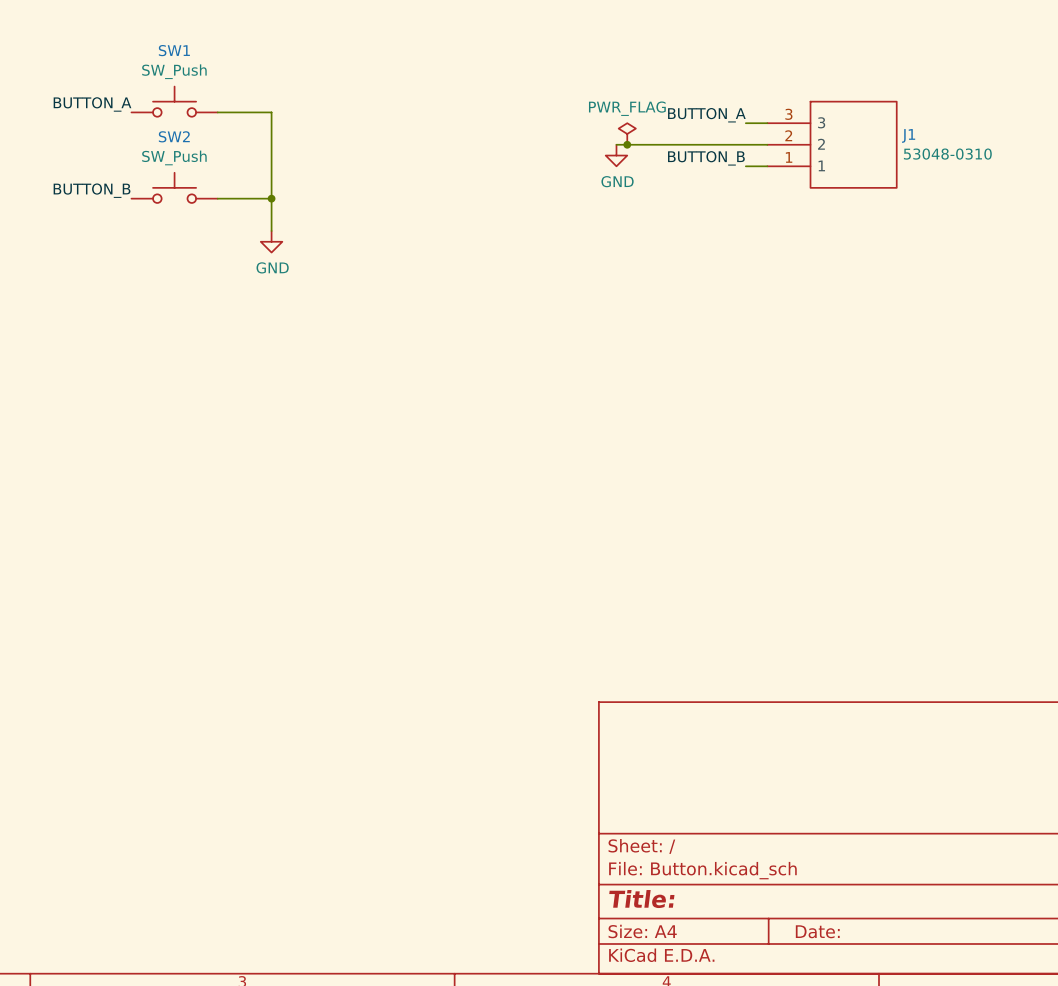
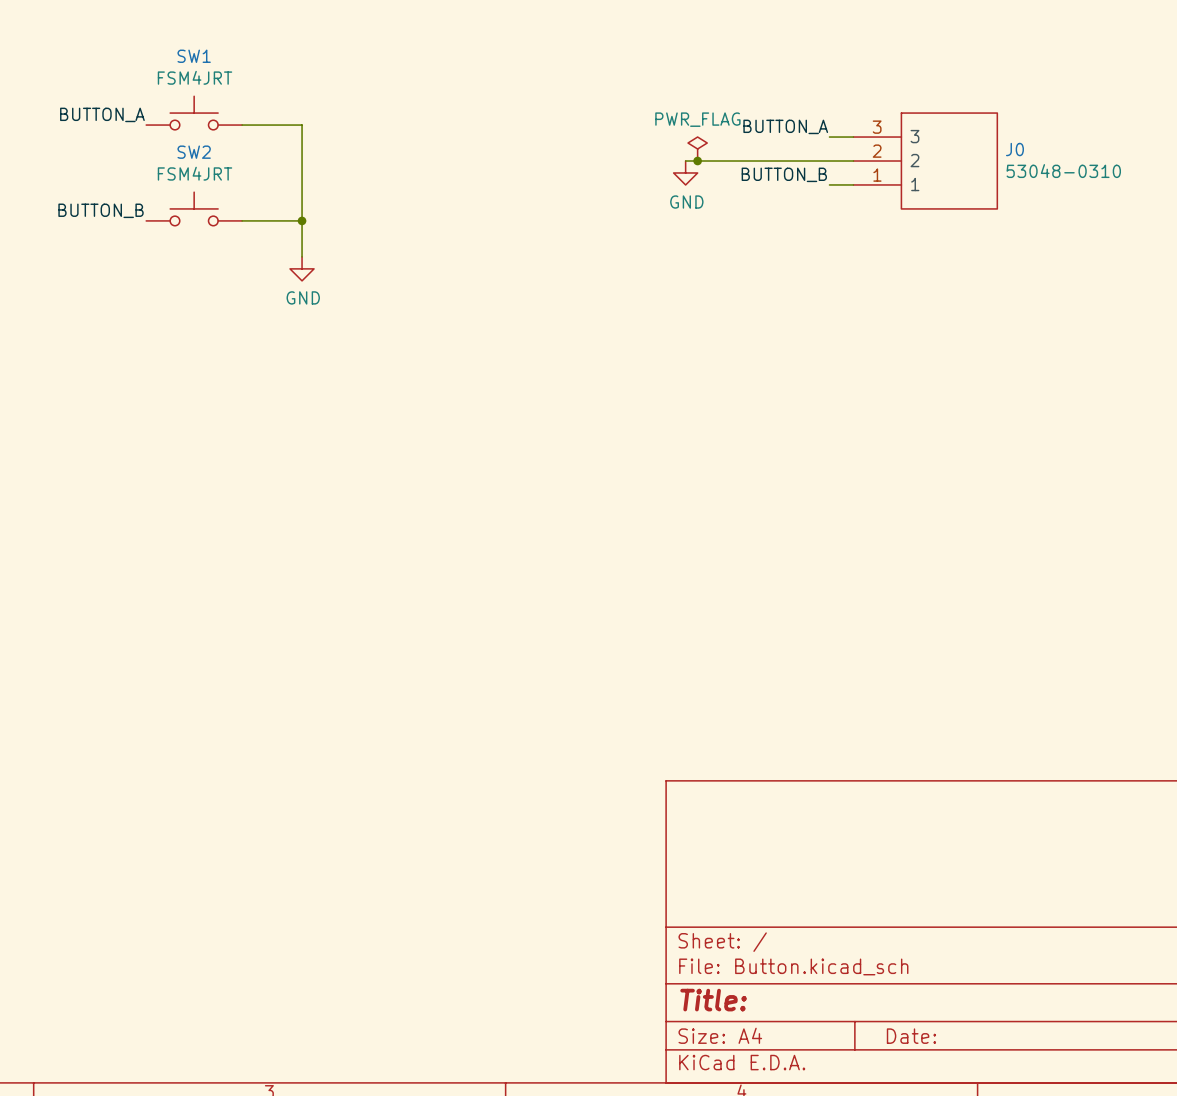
SW1 value: SW_Push (174, 71) -> FSM4JRT (195, 77)
J1 name: J1 (908, 135) -> J0 (1014, 149)
SW2 value: SW_Push (174, 157) -> FSM4JRT (195, 173)

